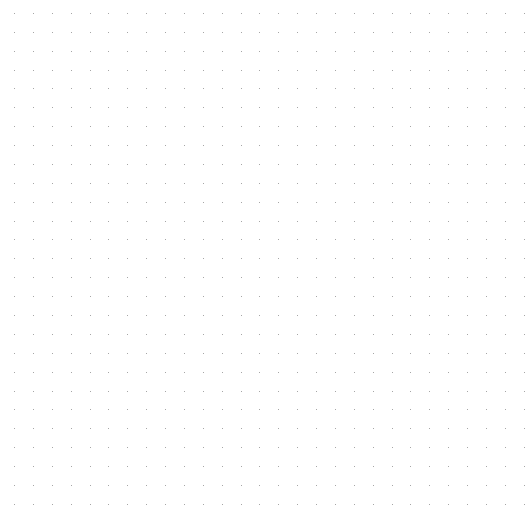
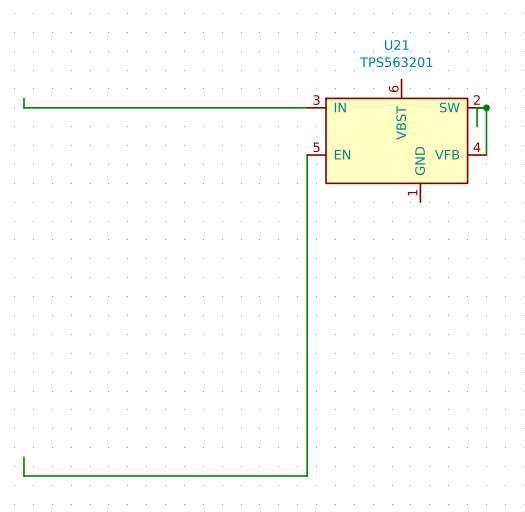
wire: none -> (23, 98) (23, 107) (307, 107)
junction: none -> (486, 107)
wire: none -> (477, 126) (477, 107) (486, 107) (486, 155)
U21: none -> TPS563201 (396, 140)
wire: none -> (307, 155) (307, 475) (23, 475) (23, 457)

